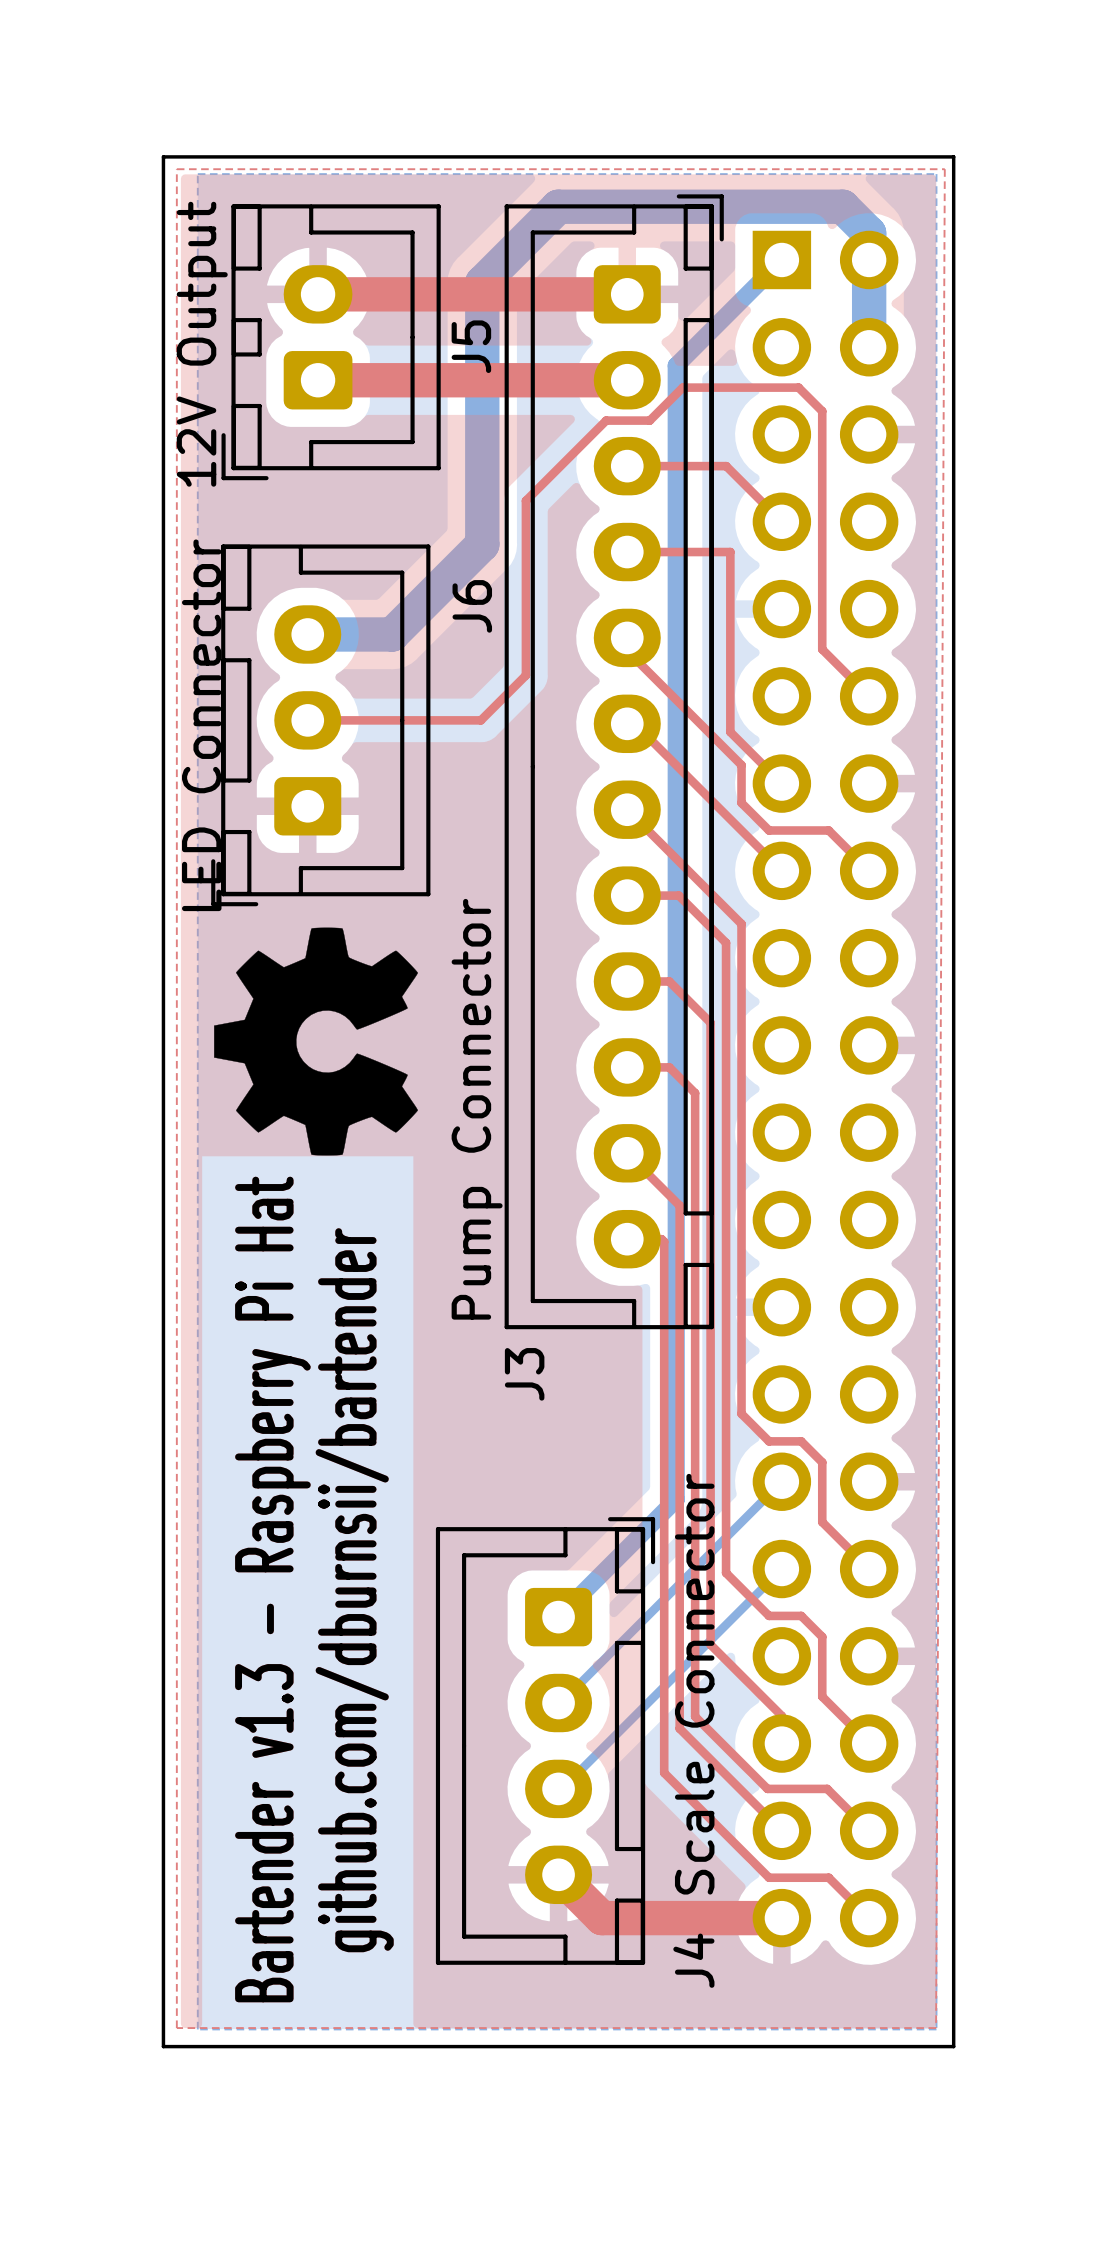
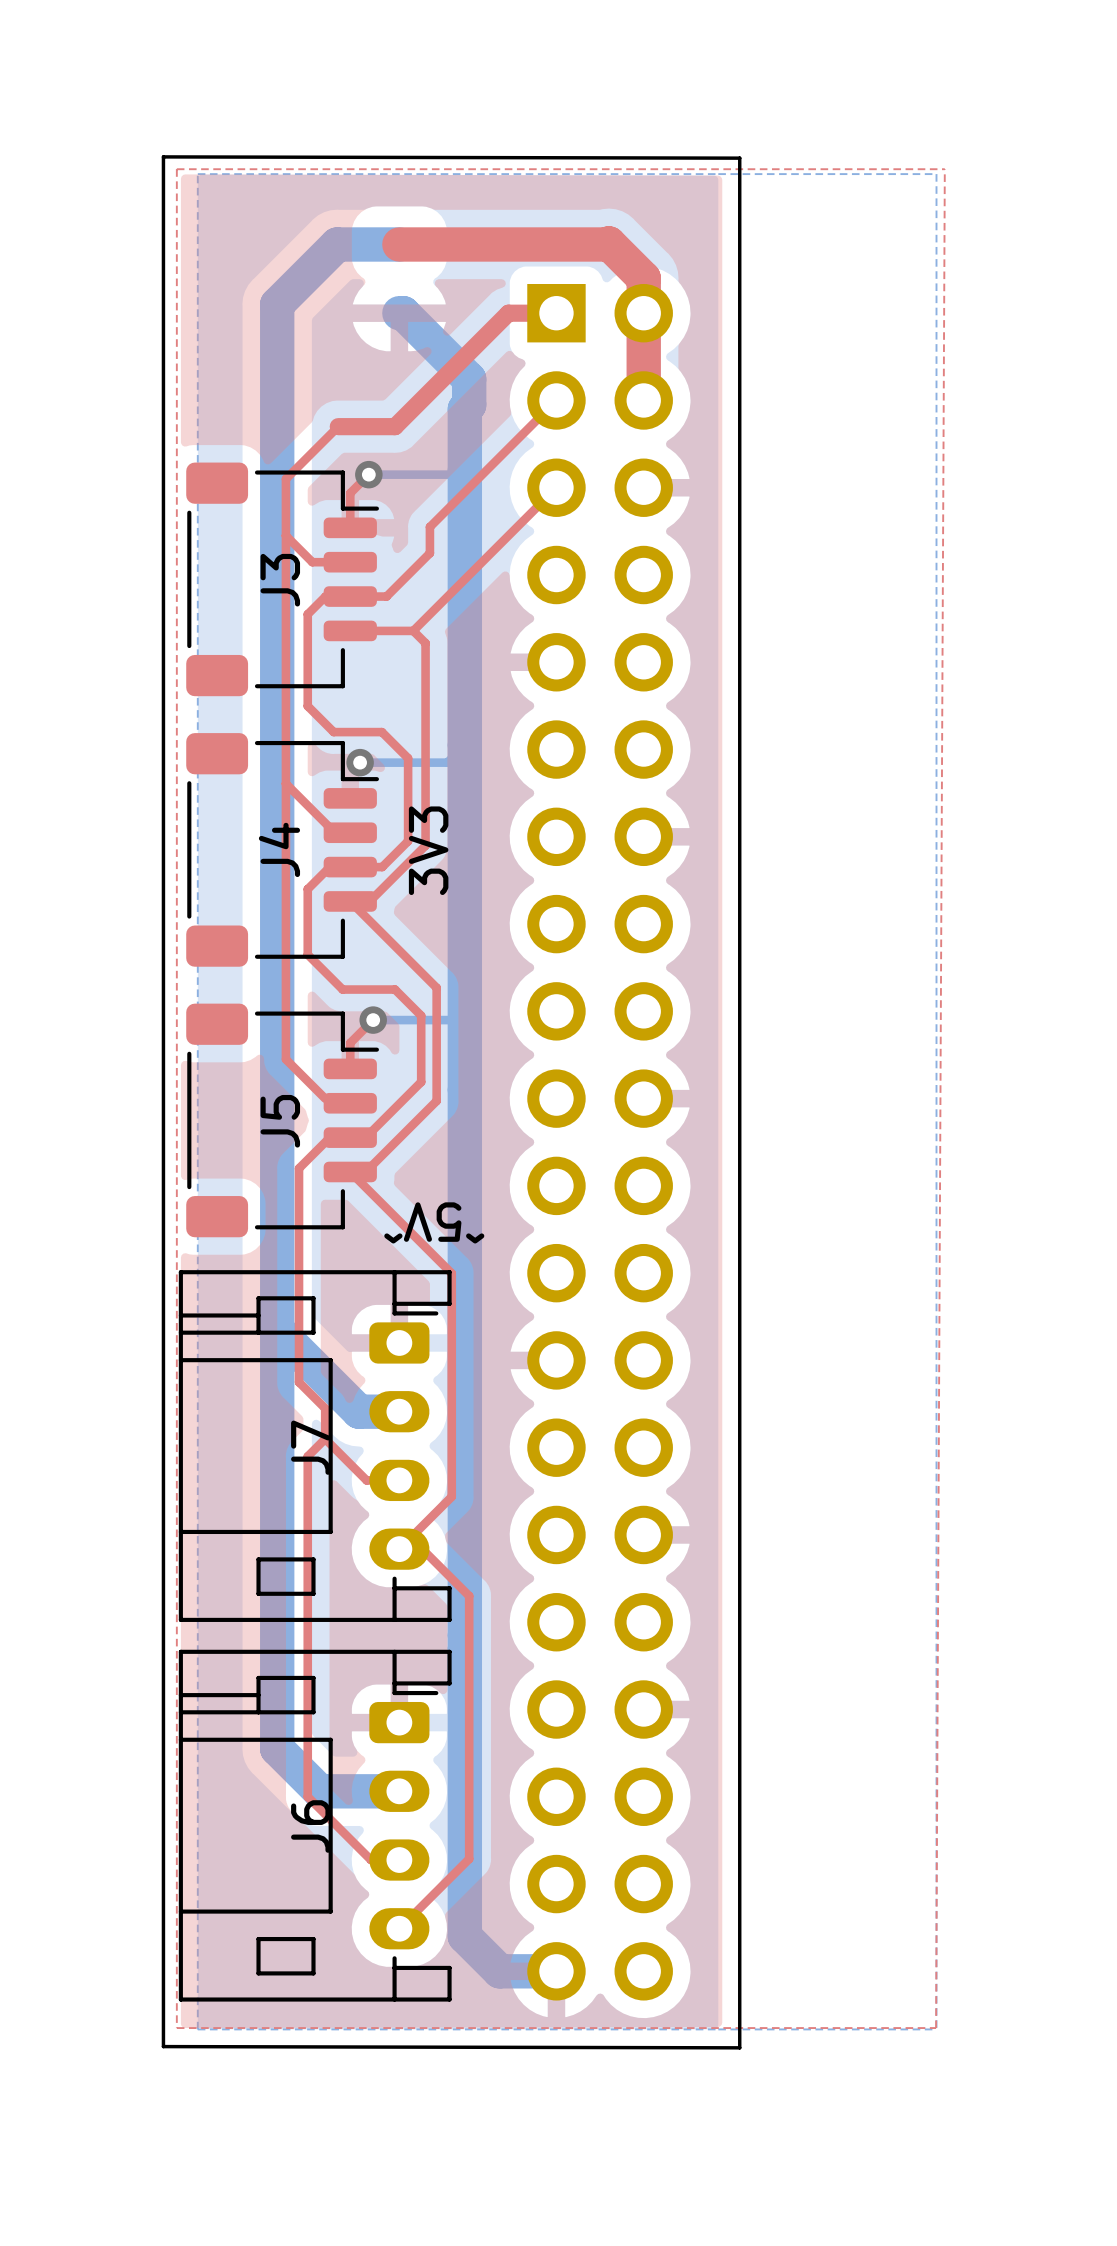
board edge: (163, 156) (953, 156) (953, 2046) (163, 2046) -> (163, 156) (739, 158) (739, 2047) (163, 2046)
J3 footprint: [504, 194, 724, 1330] -> [186, 462, 379, 697]
J5 footprint: [221, 204, 441, 481] -> [186, 1003, 379, 1238]
top track: none -> (399, 244) (608, 243) (643, 278) (643, 400)
bottom track: none -> (399, 244) (337, 244) (277, 304) (277, 1748) (319, 1791) (399, 1791)
bottom track: (781, 259) (676, 365) (676, 1499) (558, 1617) -> none
top track: (318, 294) (627, 294) -> none
bottom track: none -> (399, 313) (403, 313) (469, 379) (469, 404) (464, 409) (464, 1936)
top track: none -> (556, 313) (508, 313) (395, 426) (338, 426) (285, 479) (285, 1059) (325, 1098)
J5 value: 12V Output (202, 344) -> none
J5 name position: J5 (471, 346) -> J5 (280, 1121)
bottom track: (869, 347) (869, 233) (842, 206) (558, 206) (482, 282) (482, 544) (392, 634) (307, 634) -> none
top track: (318, 380) (627, 380) -> none
top track: none -> (556, 400) (429, 527) (429, 553) (386, 596) (325, 596) (307, 614) (307, 706) (333, 732) (381, 732) (408, 758) (408, 841) (382, 867) (329, 867) (307, 889) (307, 954) (342, 989) (395, 989) (421, 1015) (421, 1082) (365, 1137) (329, 1137) (299, 1168) (299, 1382) (325, 1408) (325, 1438)
top track: (627, 466) (726, 466) (781, 521) -> none
bottom track: none -> (464, 470) (460, 474) (368, 474)
top track: none -> (368, 474) (350, 493) (350, 527)
via: none -> (368, 474)
top track: none -> (556, 487) (413, 630)
top track: none -> (285, 535) (312, 562) (350, 562)
J6 footprint: [211, 544, 431, 907] -> [178, 1649, 452, 2002]
top track: (627, 552) (730, 552) (730, 732) (781, 783) -> none
J6 name position: J6 (472, 606) -> J6 (310, 1826)
top track: none -> (350, 630) (413, 630)
top track: none -> (413, 630) (425, 643) (425, 845) (369, 901) (350, 901) (436, 987) (436, 1100) (365, 1171) (350, 1171) (451, 1273) (451, 1496) (399, 1549) (422, 1549) (469, 1596) (469, 1858) (399, 1928)
top track: (627, 637) (627, 650) (741, 765) (741, 802) (769, 830) (828, 830) (869, 870) -> none
top track: (869, 696) (822, 649) (822, 411) (798, 387) (682, 387) (649, 420) (606, 420) (525, 500) (525, 675) (480, 720) (307, 720) -> none
top track: (627, 723) (634, 723) (781, 870) -> none
J6 value: LED Connector (201, 725) -> none
bottom track: none -> (464, 745) (447, 762) (360, 762)
via: none -> (360, 762)
top track: none -> (285, 783) (334, 832) (350, 832)
top track: (627, 809) (741, 923) (741, 1413) (769, 1441) (801, 1441) (822, 1462) (822, 1522) (869, 1569) -> none
text: none -> 3V3 (428, 850)
top track: (627, 895) (678, 895) (726, 942) (726, 1572) (769, 1615) (801, 1615) (822, 1636) (822, 1696) (869, 1743) -> none
drawing: [214, 927, 418, 1156] -> none
top track: (627, 981) (669, 981) (710, 1022) (710, 1644) (781, 1716) (781, 1743) -> none
top track: none -> (373, 1020) (350, 1043) (350, 1068)
bottom track: none -> (373, 1020) (464, 1020)
via: none -> (373, 1020)
top track: (627, 1067) (669, 1067) (695, 1093) (695, 1716) (767, 1788) (827, 1788) (869, 1830) -> none
part position: (825, 1089) -> (600, 1142)
J3 value: Pump Connector (477, 1109) -> none
top track: (627, 1153) (679, 1205) (679, 1728) (781, 1830) -> none
text: none -> ^5V^ (434, 1222)
top track: (627, 1239) (661, 1239) (664, 1241) (664, 1772) (769, 1877) (828, 1877) (869, 1918) -> none
bottom track: none -> (277, 1329) (359, 1411) (399, 1411)
J3 name position: J3 (524, 1374) -> J3 (280, 580)
top track: none -> (325, 1438) (366, 1480) (399, 1480)
top track: none -> (325, 1438) (307, 1456) (307, 1796) (371, 1860) (399, 1860)
J7: none -> (315, 1446)
bottom track: (781, 1481) (558, 1703) -> none
J4 footprint: [435, 1517, 656, 1965] -> [186, 733, 379, 967]
bottom track: (781, 1569) (562, 1788) (558, 1788) -> none
text: Bartender v1.3 - Raspberry Pi Hat (272, 1589) -> none
text: github.com/dburnsii/bartender (354, 1590) -> none
J4 value: Scale Connector (694, 1684) -> none
top track: (558, 1874) (601, 1918) (781, 1918) -> none
bottom track: none -> (464, 1936) (499, 1971) (556, 1971)
J4 name position: J4 (693, 1960) -> J4 (279, 849)

